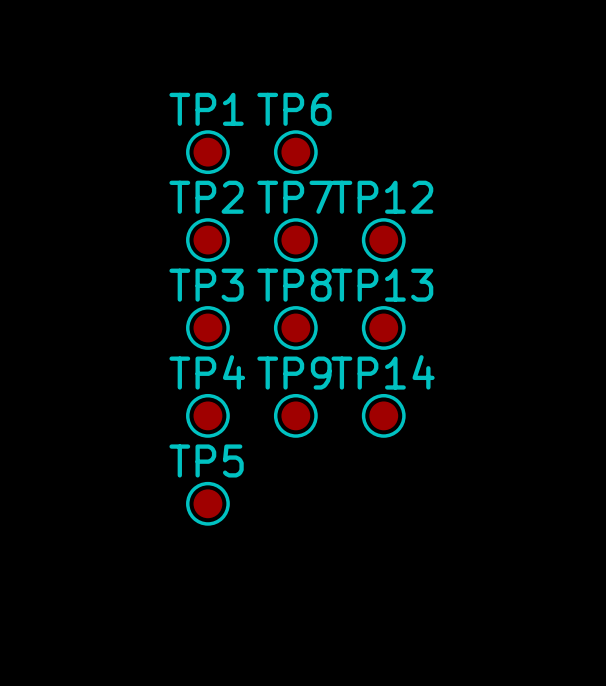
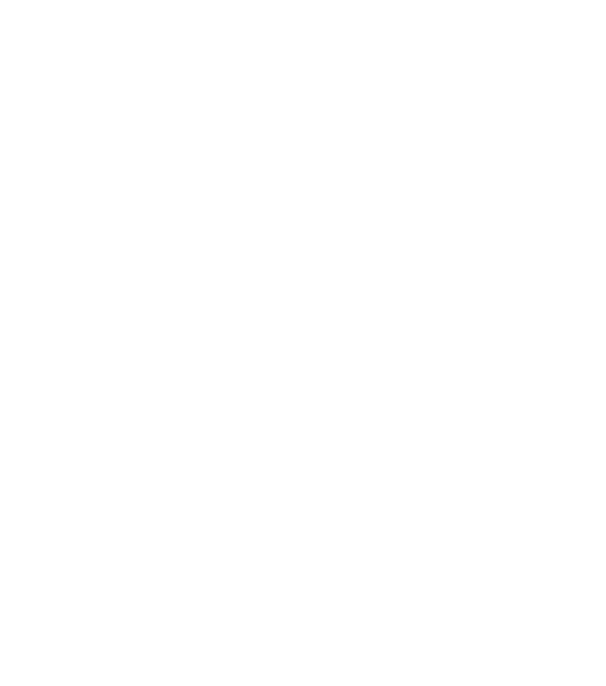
TP1: (207, 152) -> none
TP6: (295, 152) -> none
TP2: (207, 240) -> none
TP7: (295, 240) -> none
TP12: (383, 240) -> none
TP3: (207, 327) -> none
TP8: (295, 327) -> none
TP13: (383, 327) -> none
TP4: (207, 415) -> none
TP9: (295, 415) -> none
TP14: (383, 415) -> none
TP5: (207, 503) -> none

